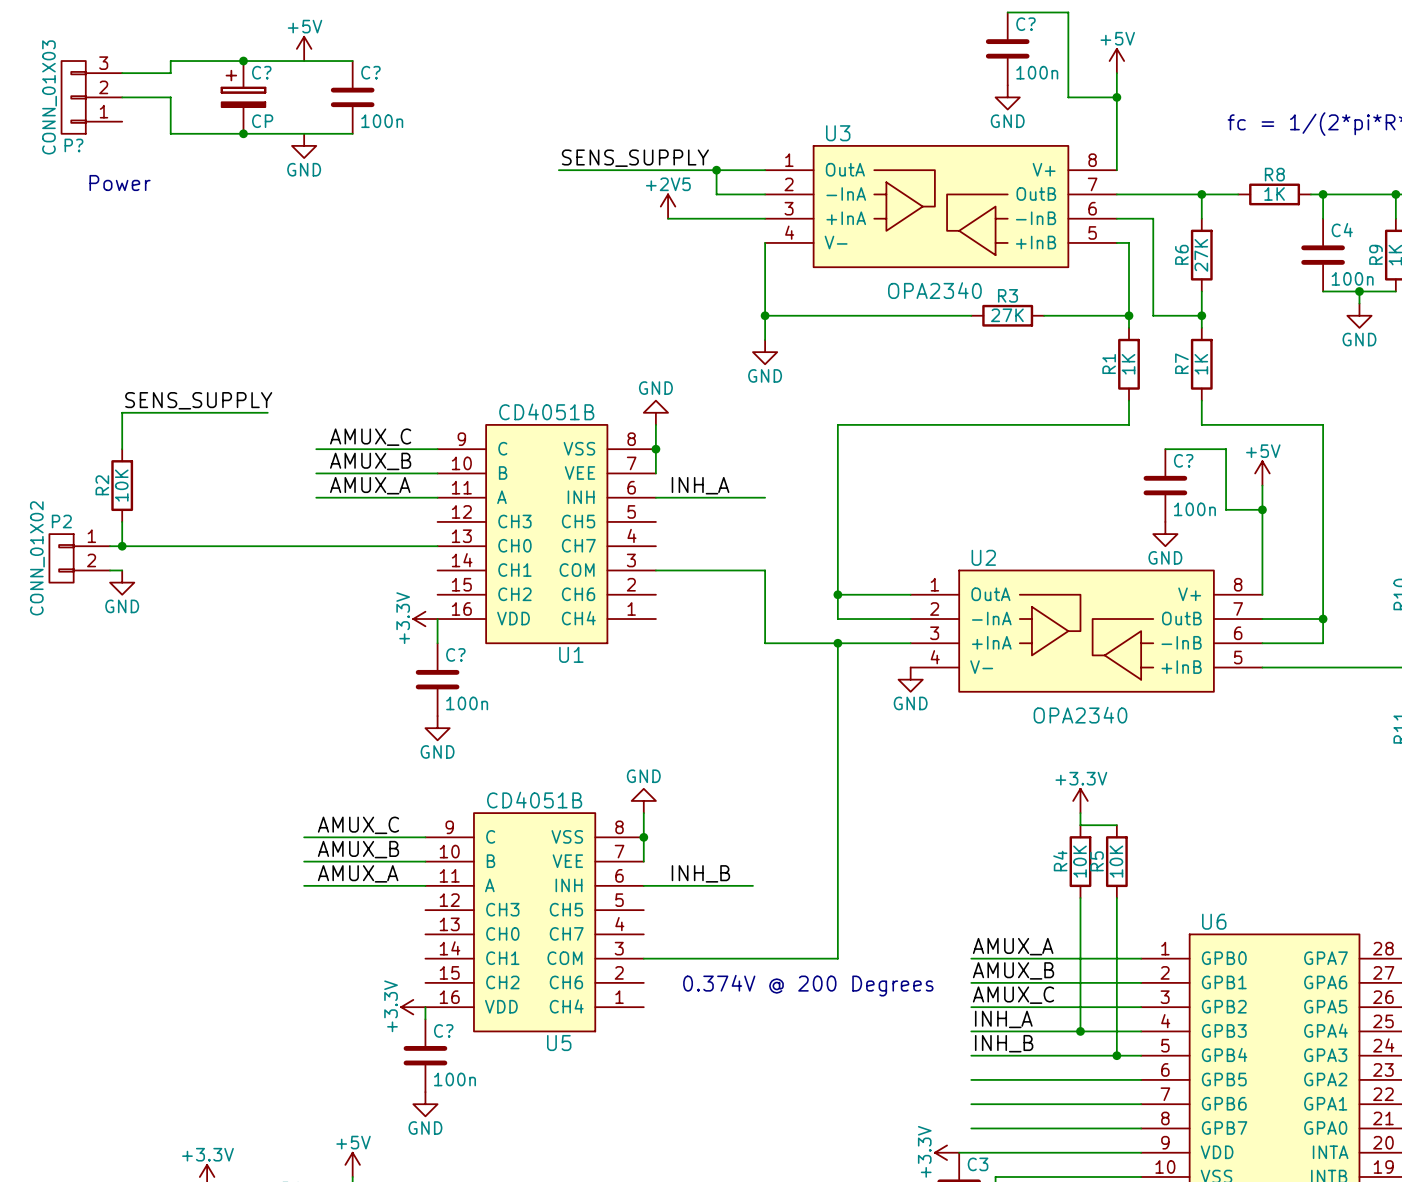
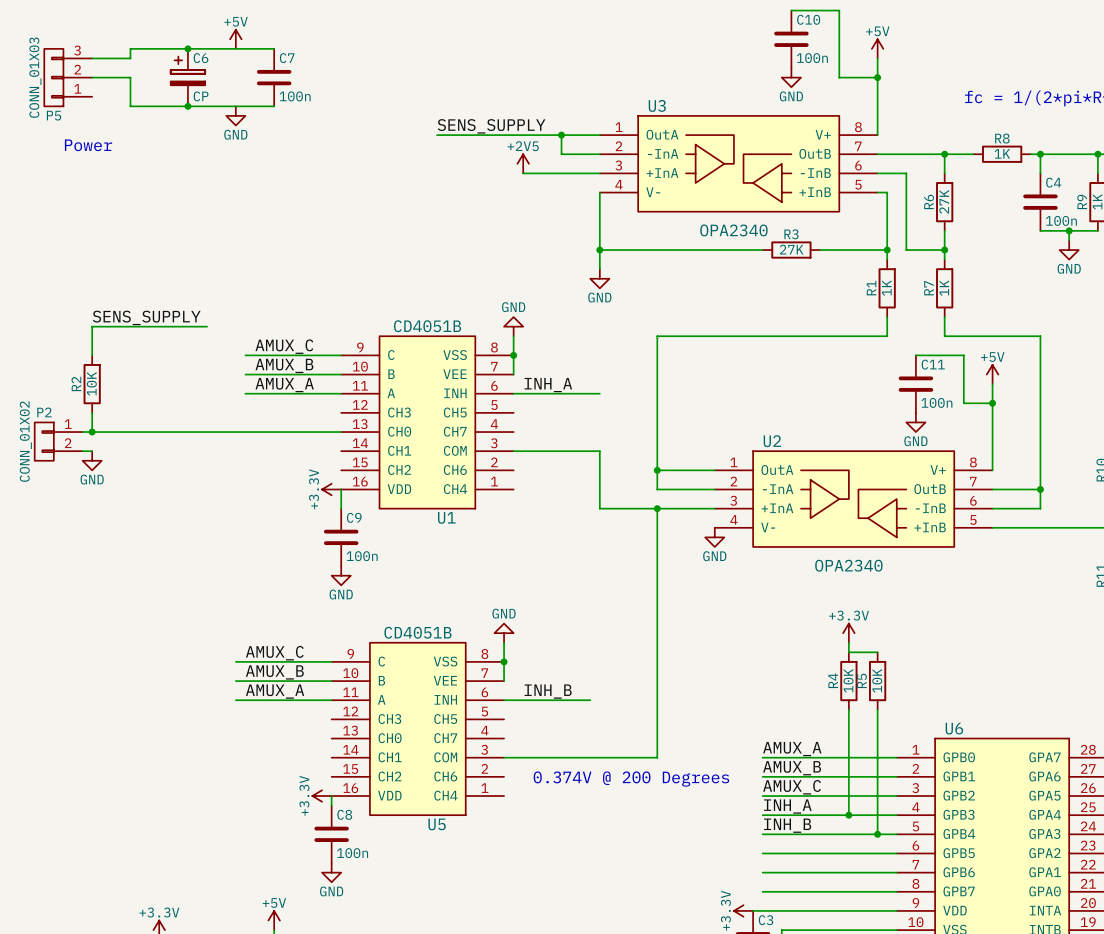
C? name: C? (1025, 24) -> C10 (808, 19)
C? name: C? (261, 72) -> C6 (201, 58)
C? name: C? (370, 72) -> C7 (287, 58)
P? name: P? (73, 145) -> P5 (54, 115)
C? name: C? (1183, 460) -> C11 (933, 364)
C? name: C? (455, 654) -> C9 (354, 517)
C? name: C? (443, 1030) -> C8 (344, 814)

